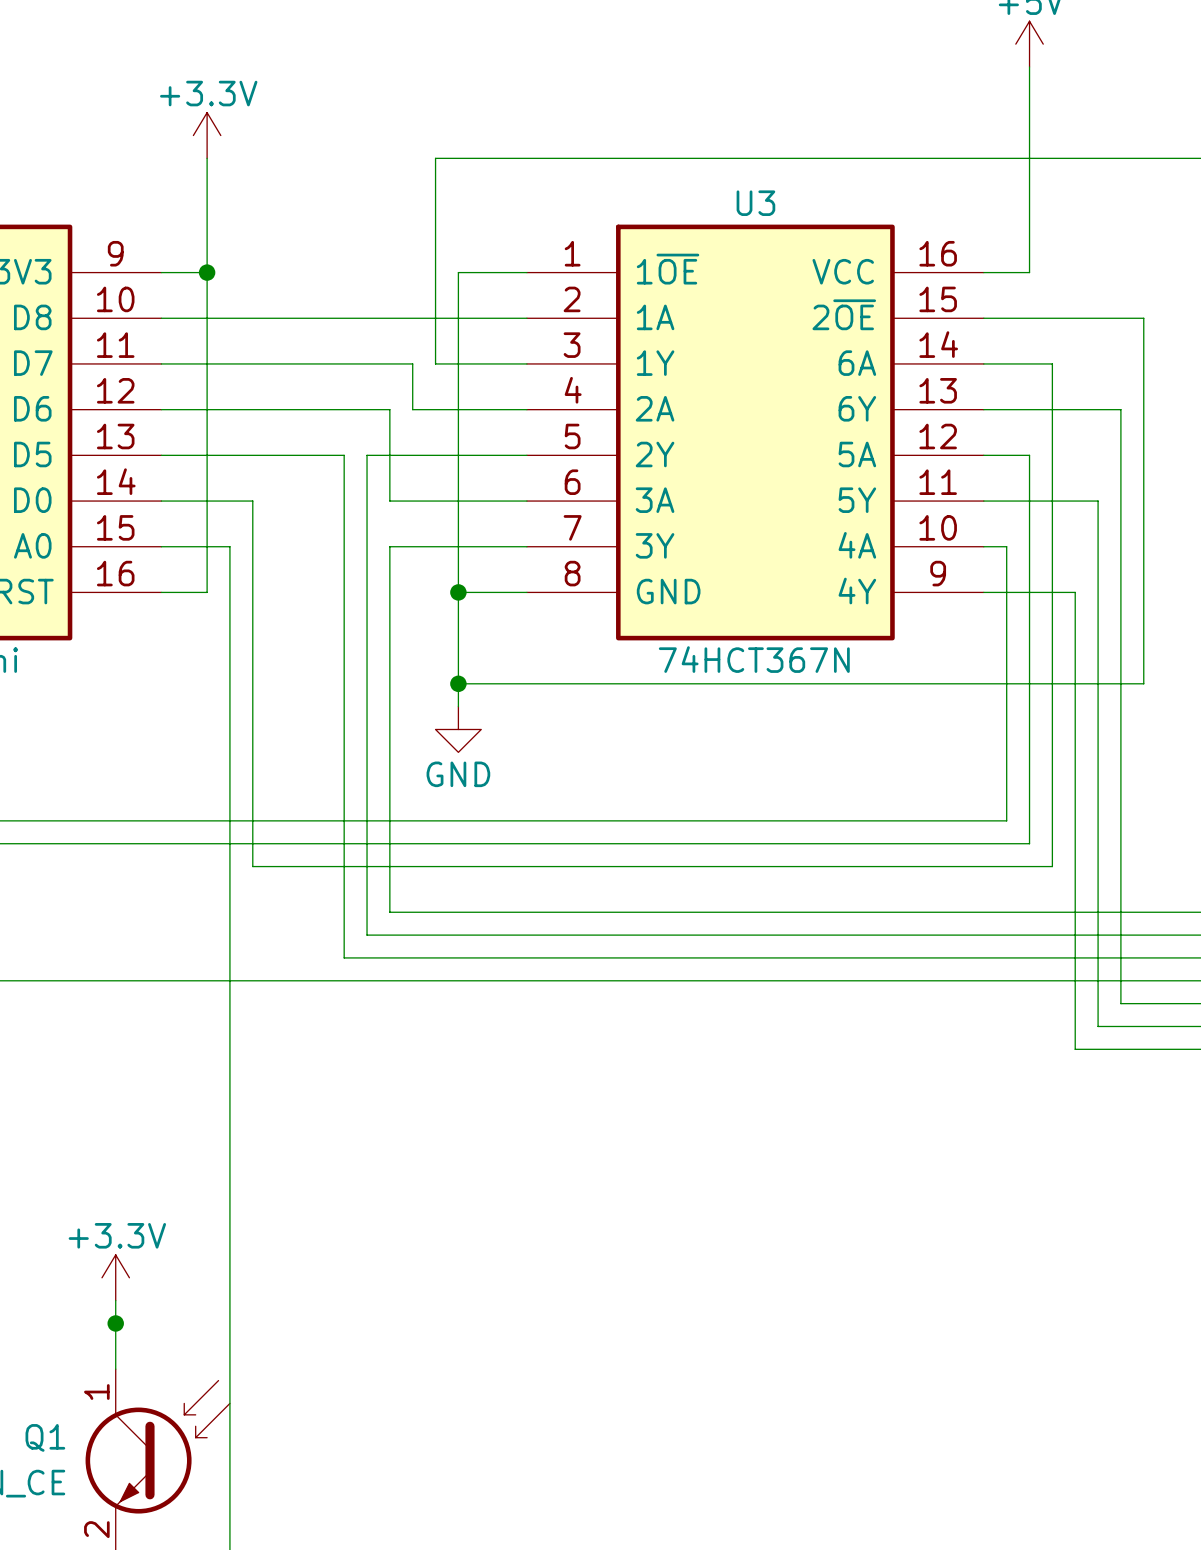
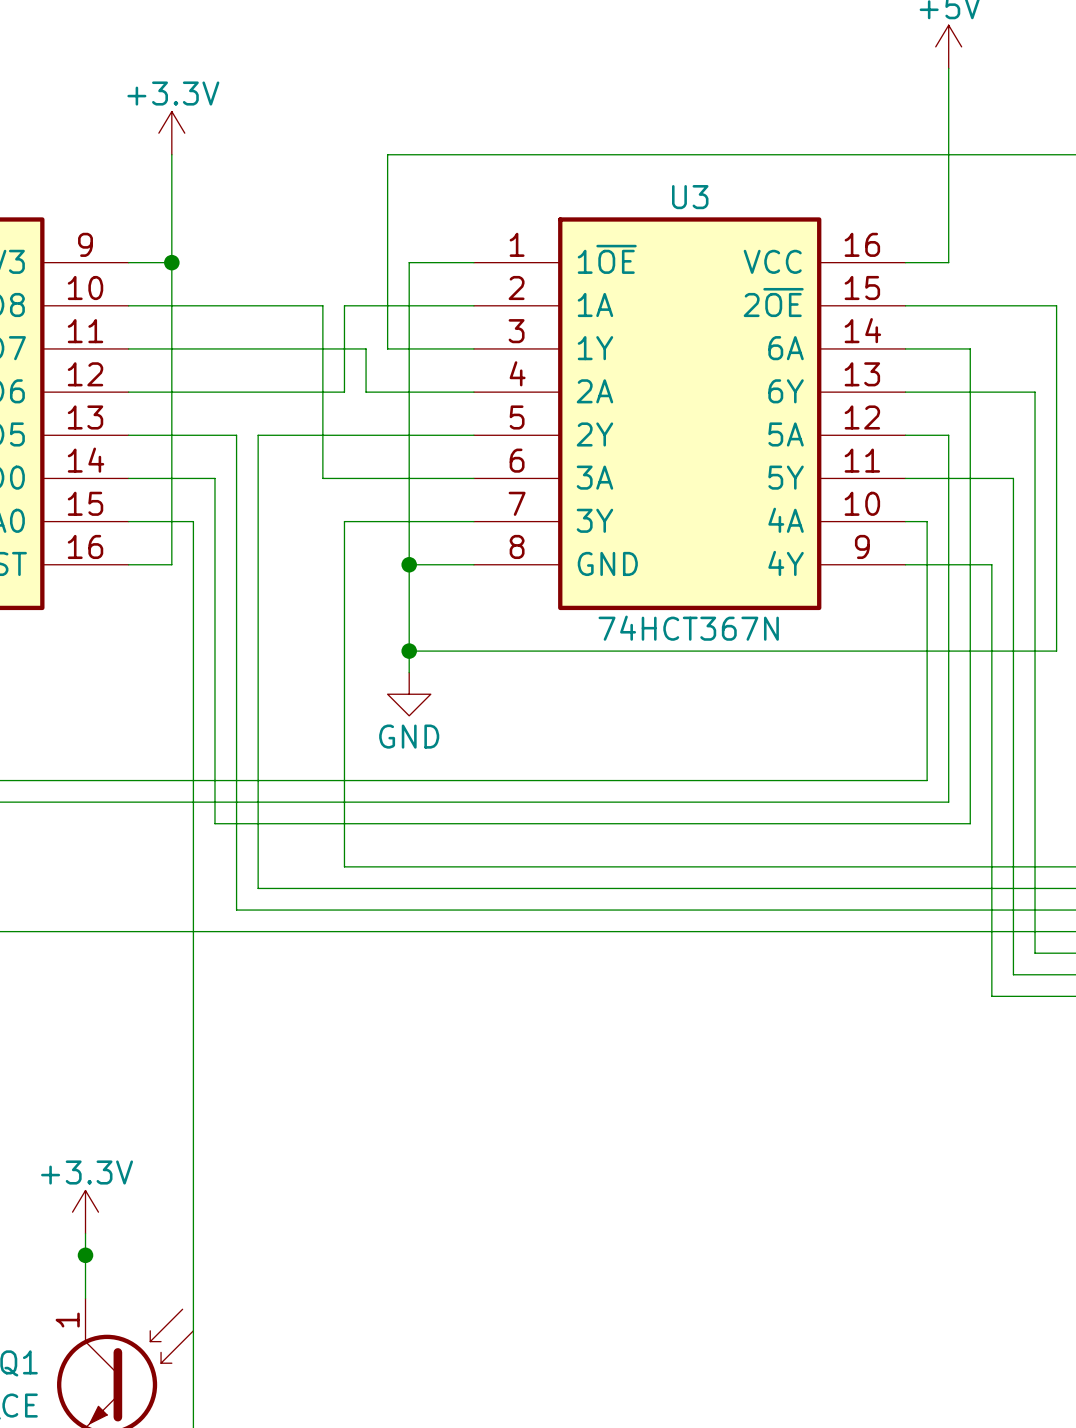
wire: (367, 318) (389, 318) -> (344, 392) (344, 305)
wire: none -> (322, 305) (322, 435) (301, 435)
wire: (389, 409) (389, 501) -> (322, 478) (344, 478)
wire: (275, 455) (298, 455) -> none
wire: (344, 455) (344, 957) -> (236, 435) (236, 910) (301, 910)
wire: (367, 501) (367, 935) -> (258, 435) (258, 888) (322, 888)

